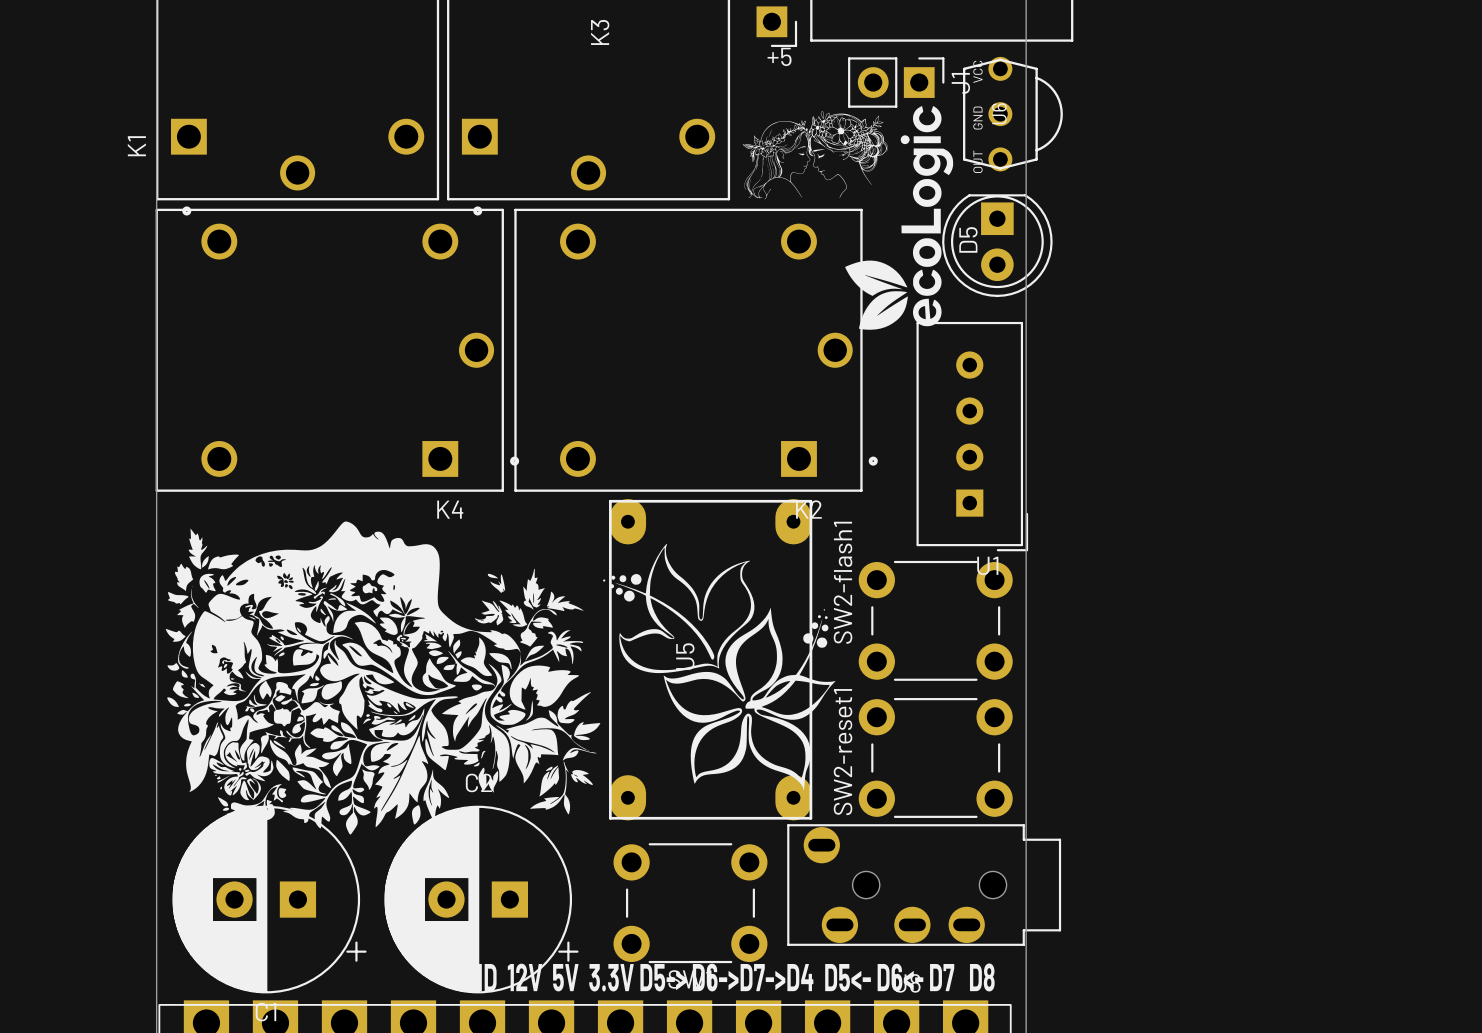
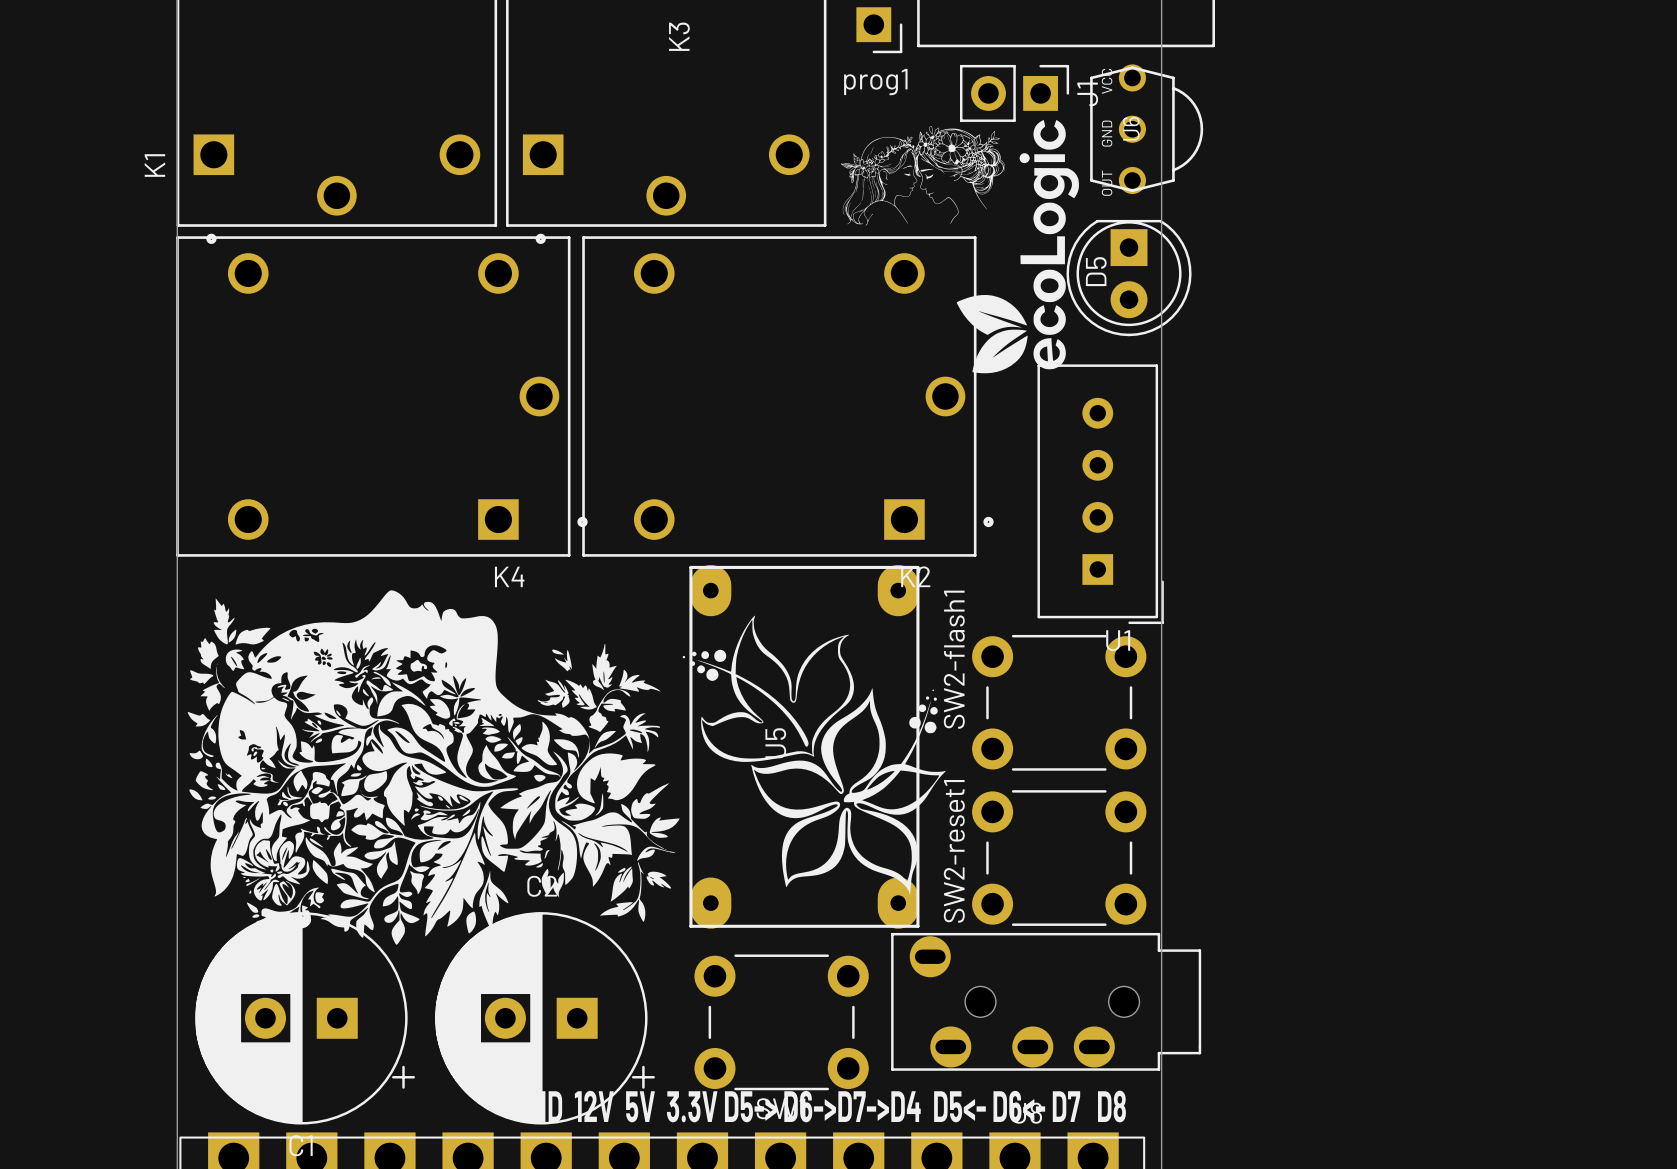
text: +5 (779, 56) -> none
prog1 name: none -> prog1 (875, 82)

